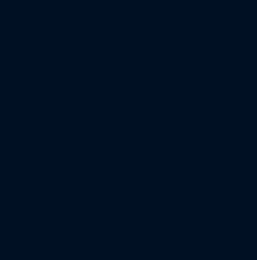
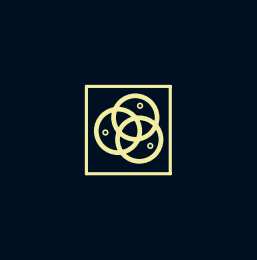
line: none -> (170, 86) (86, 86) (86, 173) (170, 173) (170, 86)
drawing: none -> [93, 93, 164, 164]

